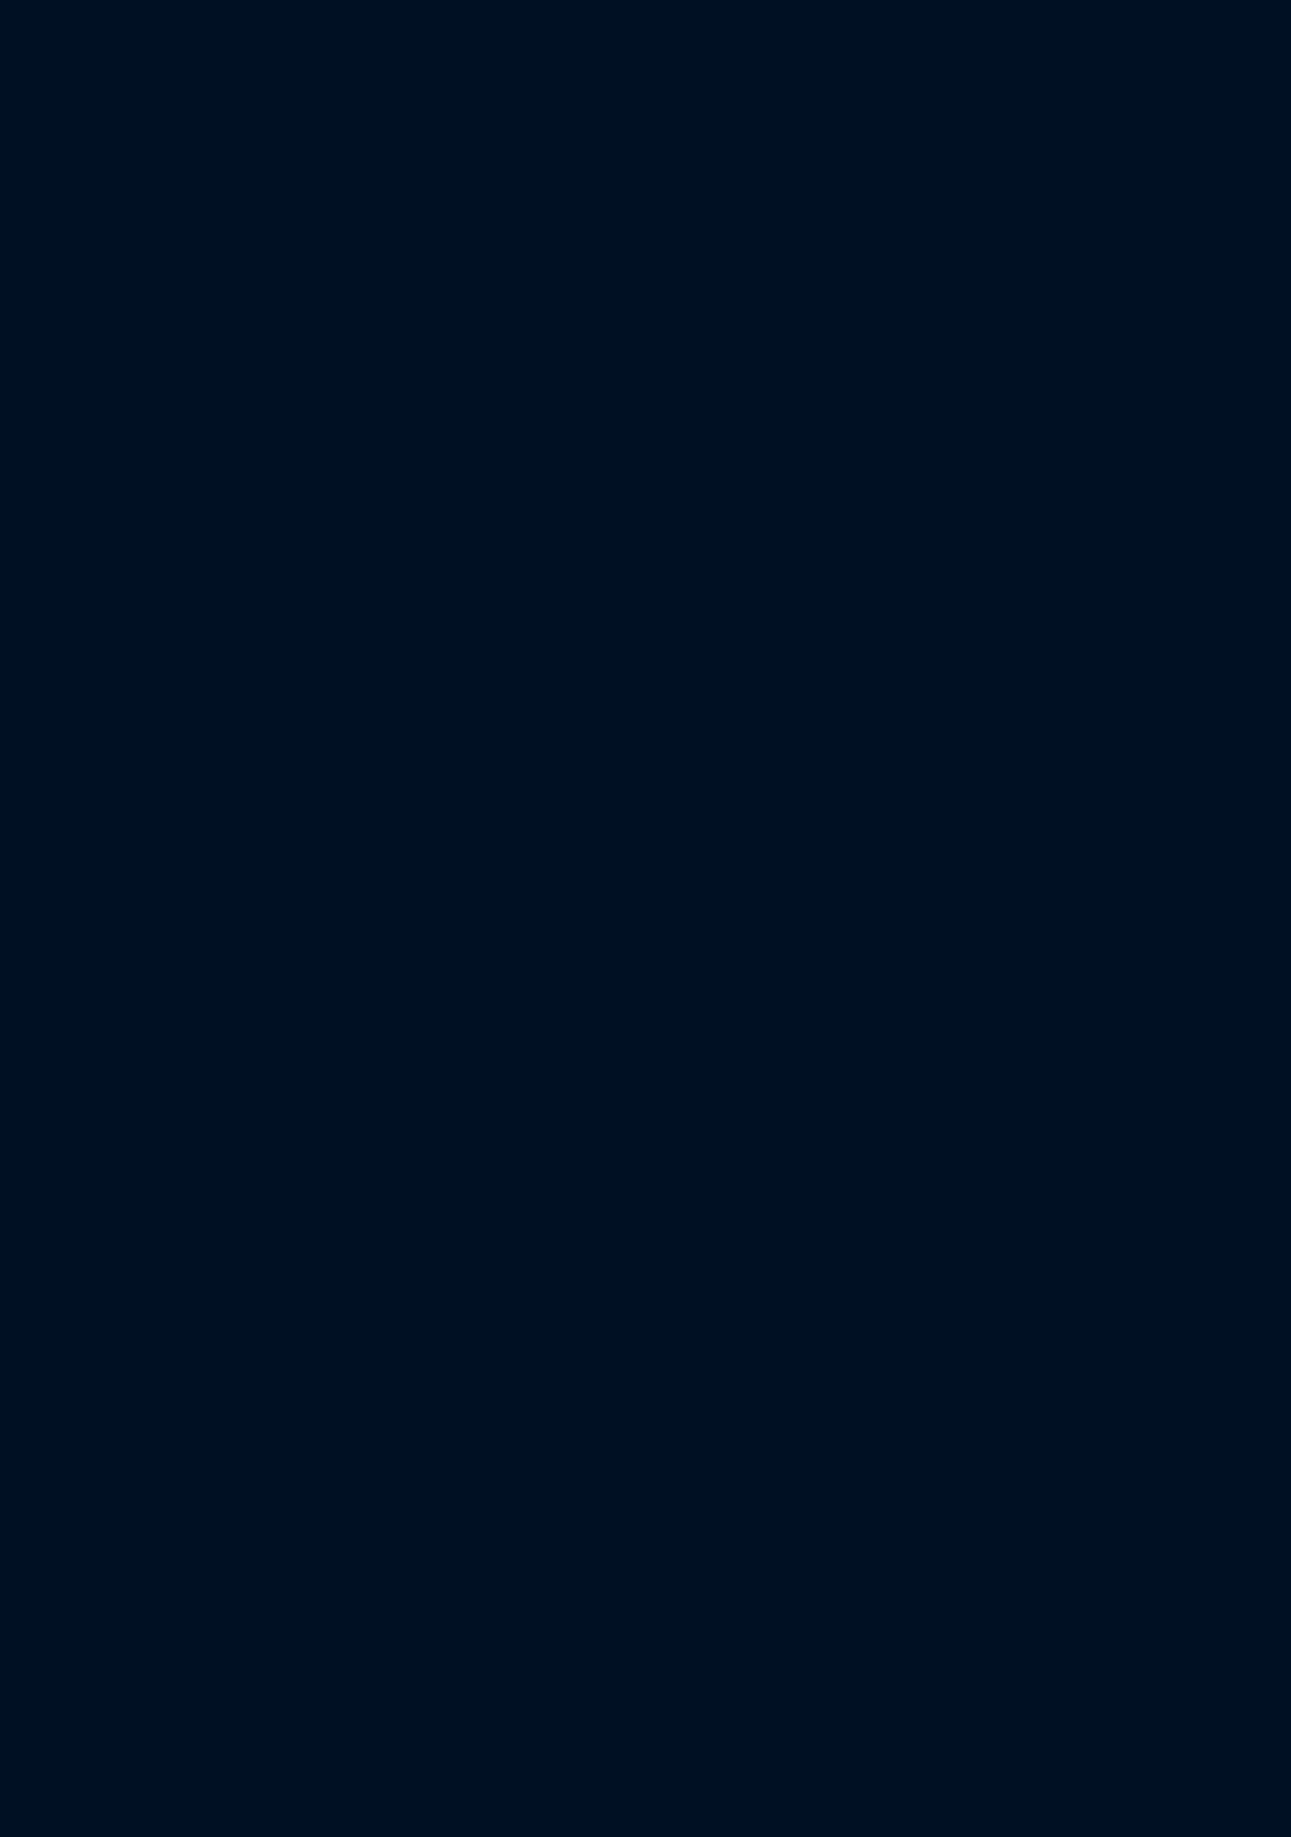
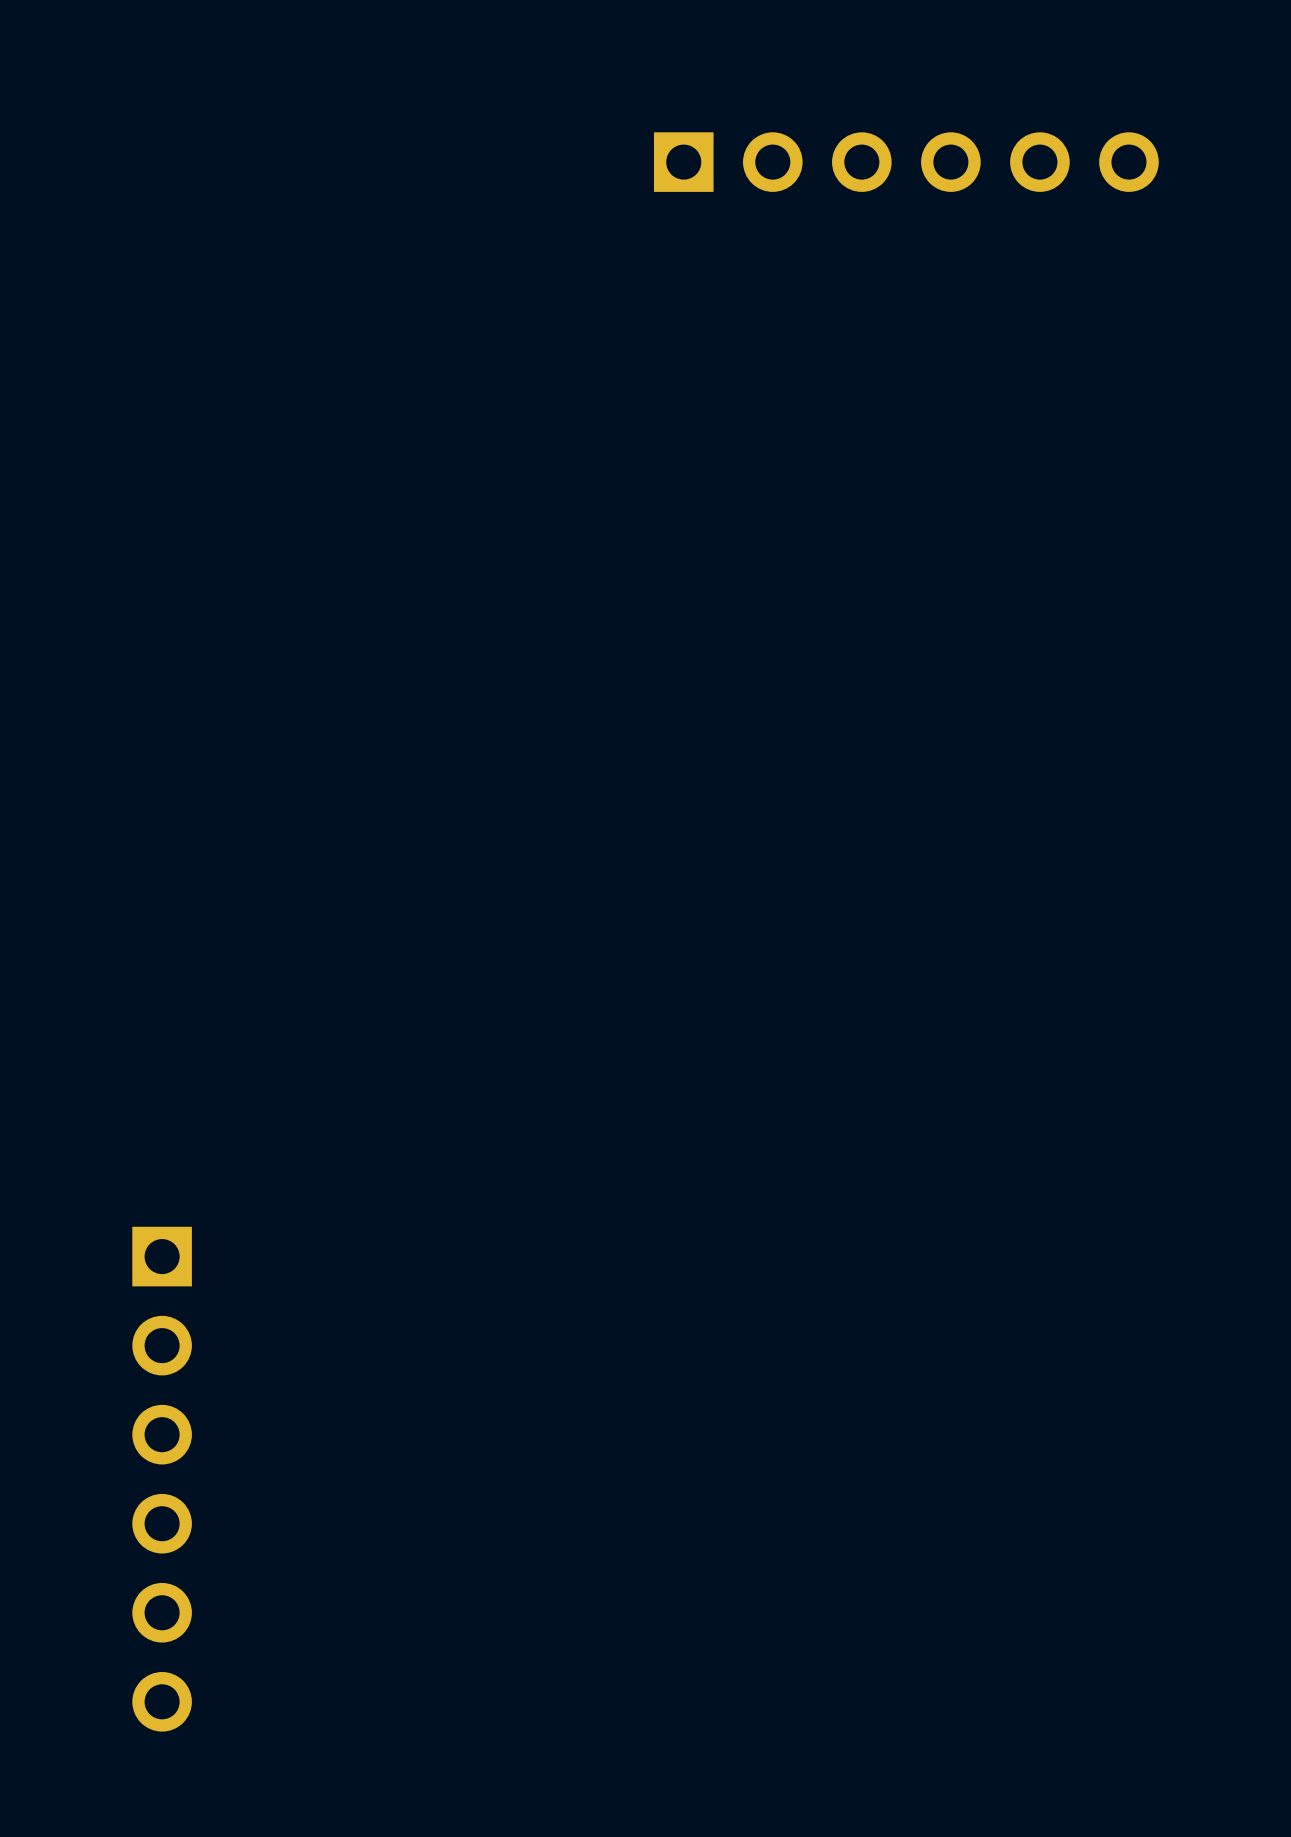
part: none -> (906, 162)
part: none -> (162, 1479)

